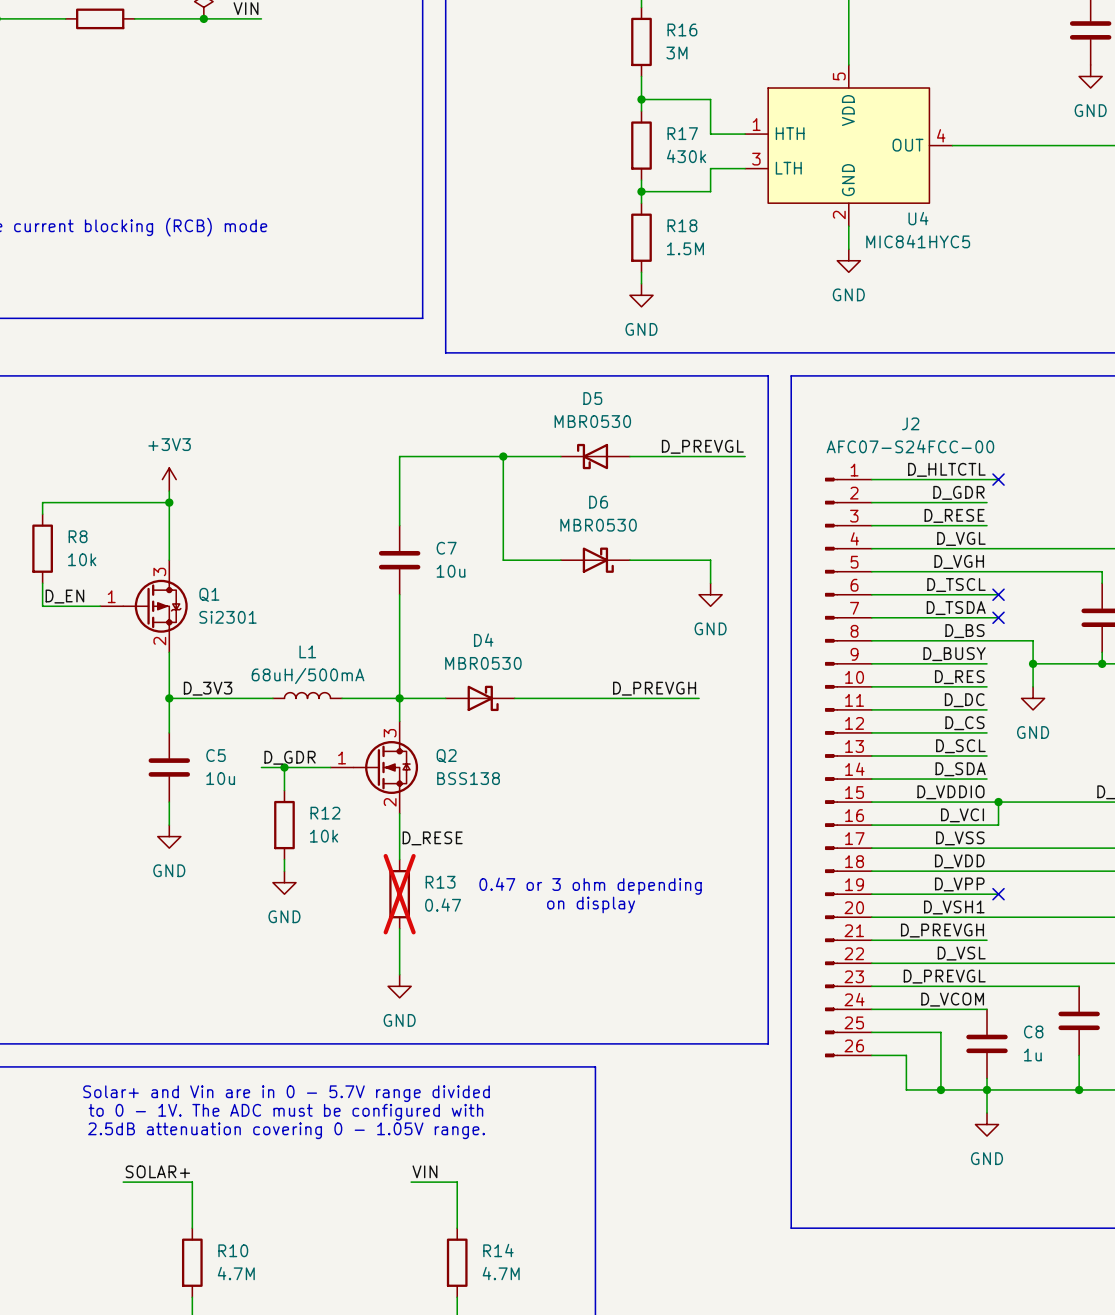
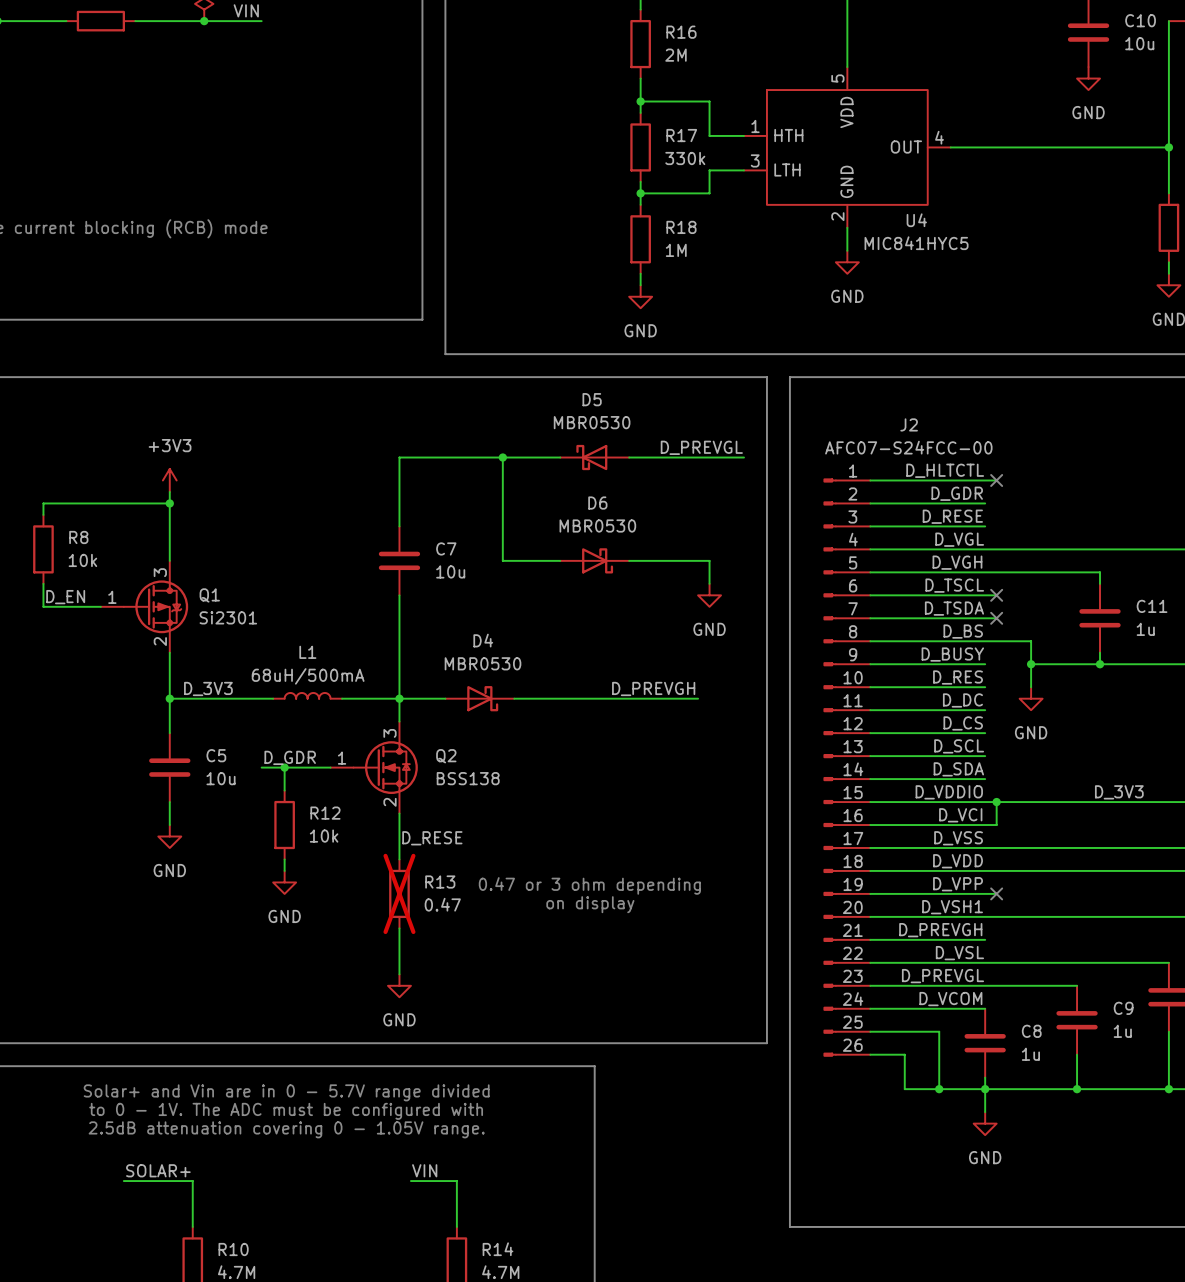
R16 value: 3M (676, 53) -> 2M (676, 55)
R17 value: 430k (686, 156) -> 330k (685, 158)
R18 value: 1.5M (685, 248) -> 1M (676, 250)

